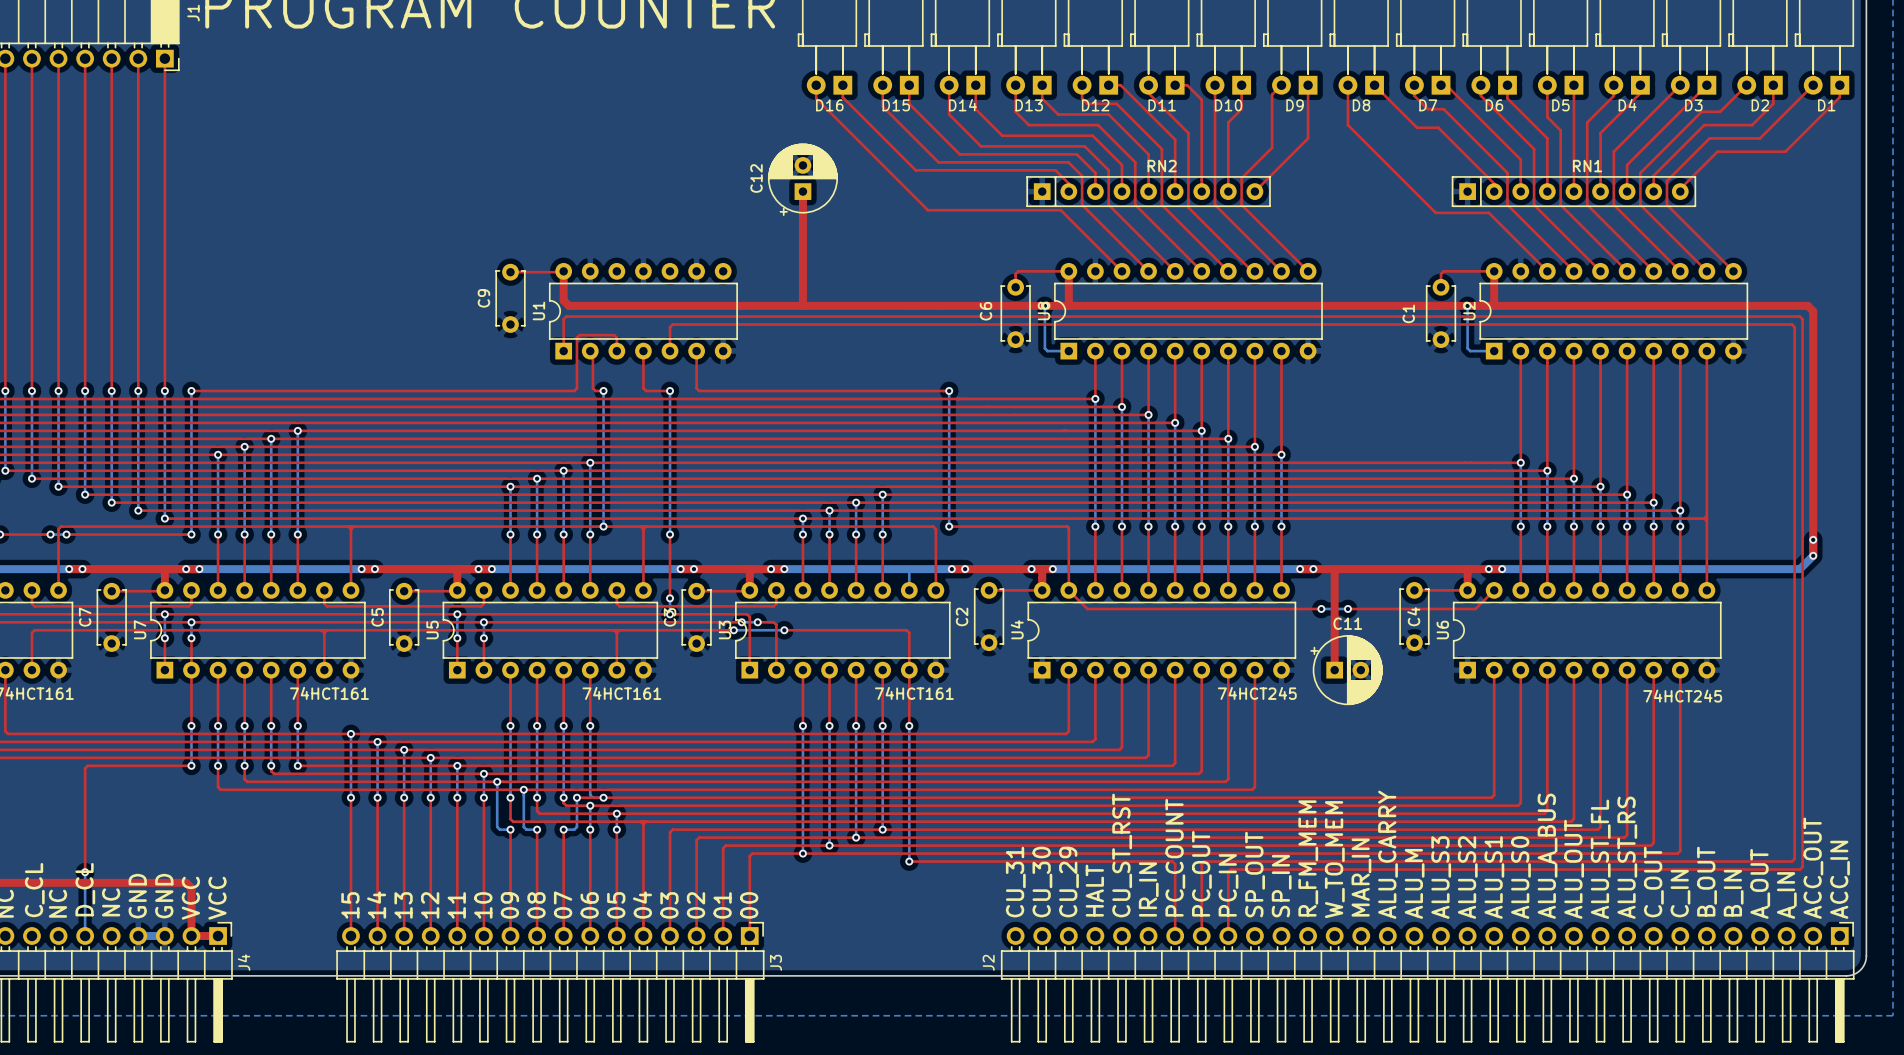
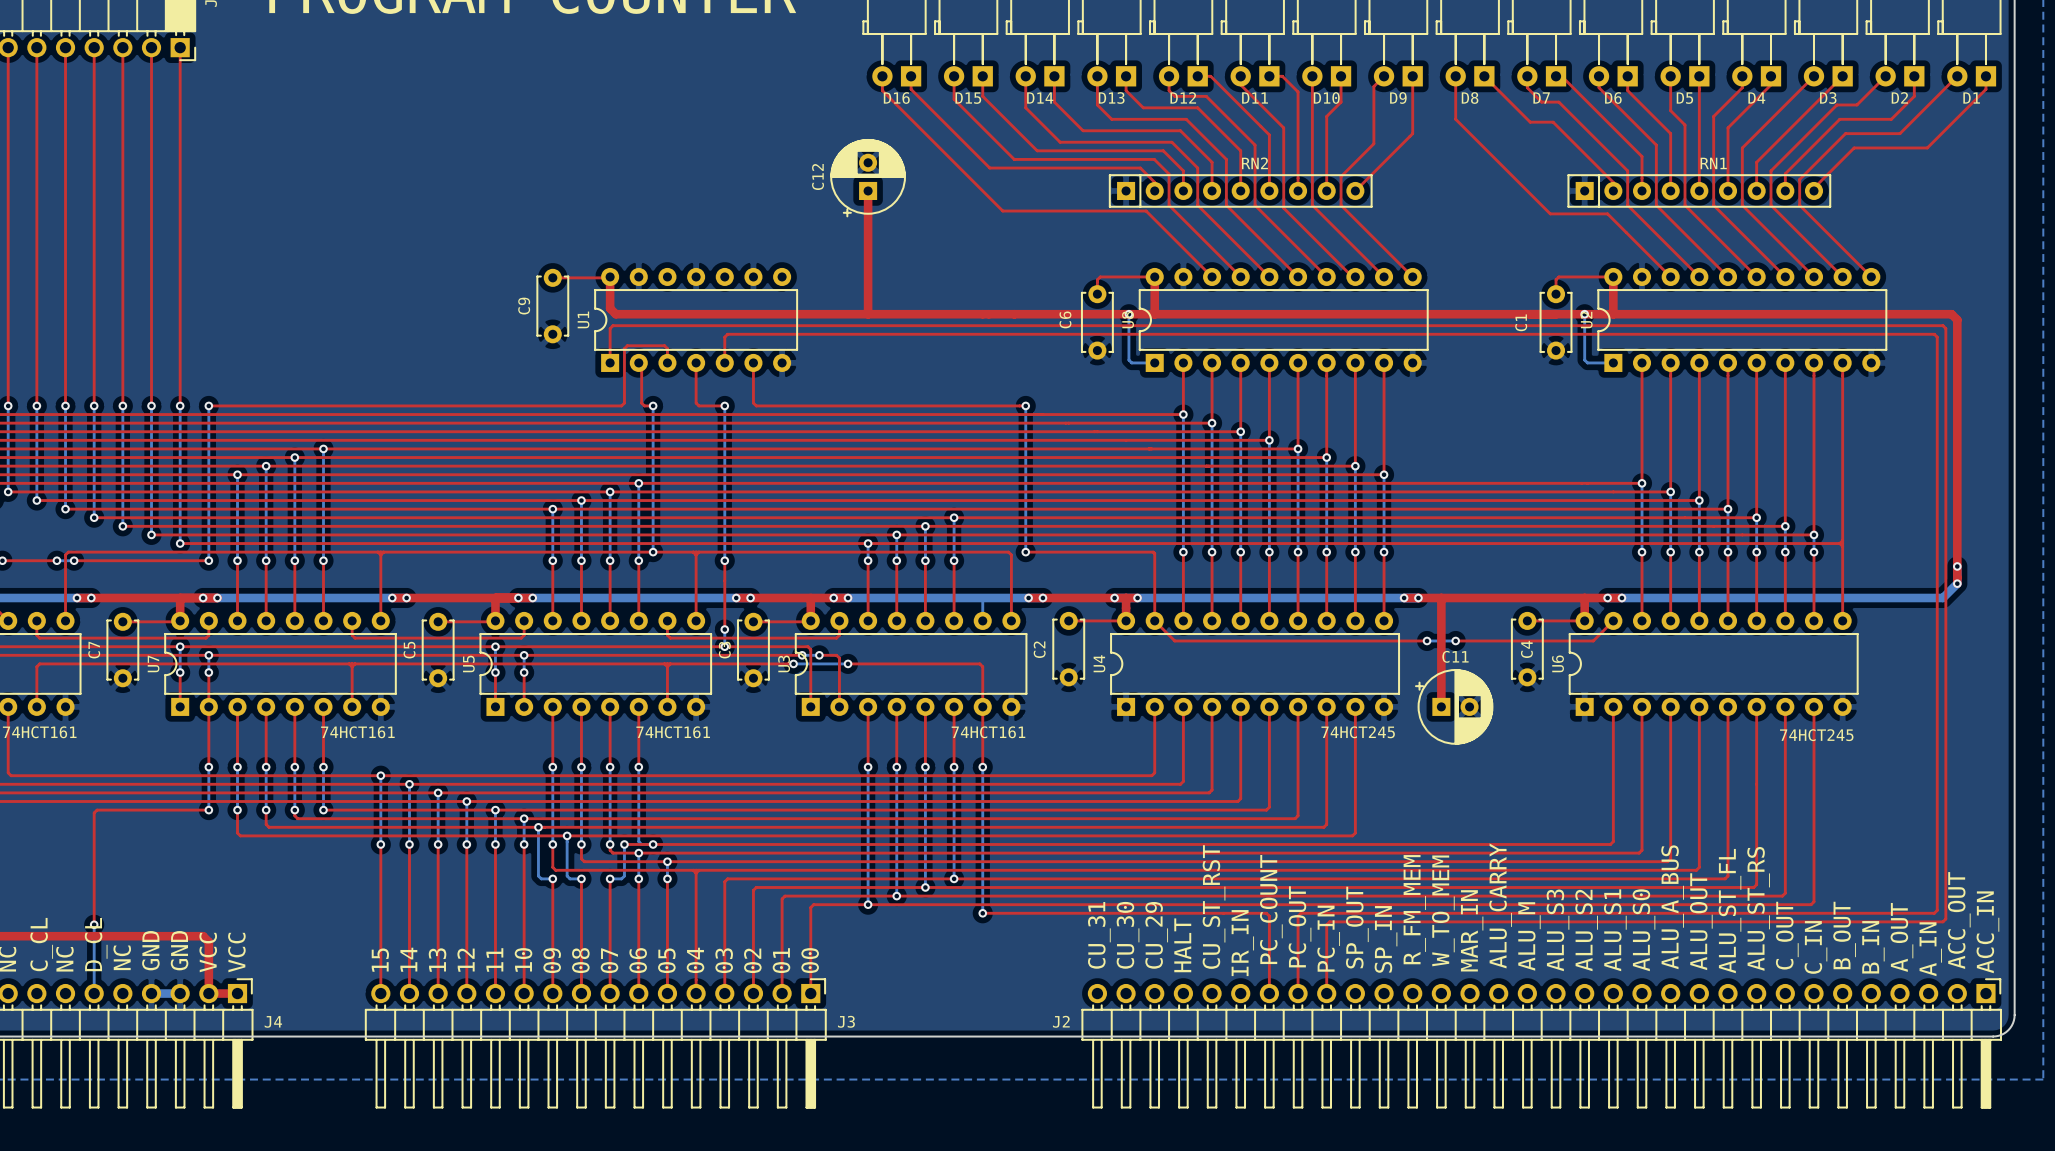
J4 name rotation: 0° (244, 962) -> 90° clockwise (273, 1021)
J3 name rotation: 0° (775, 962) -> 90° clockwise (846, 1021)
J2 name rotation: 0° (988, 962) -> 90° clockwise (1061, 1021)

